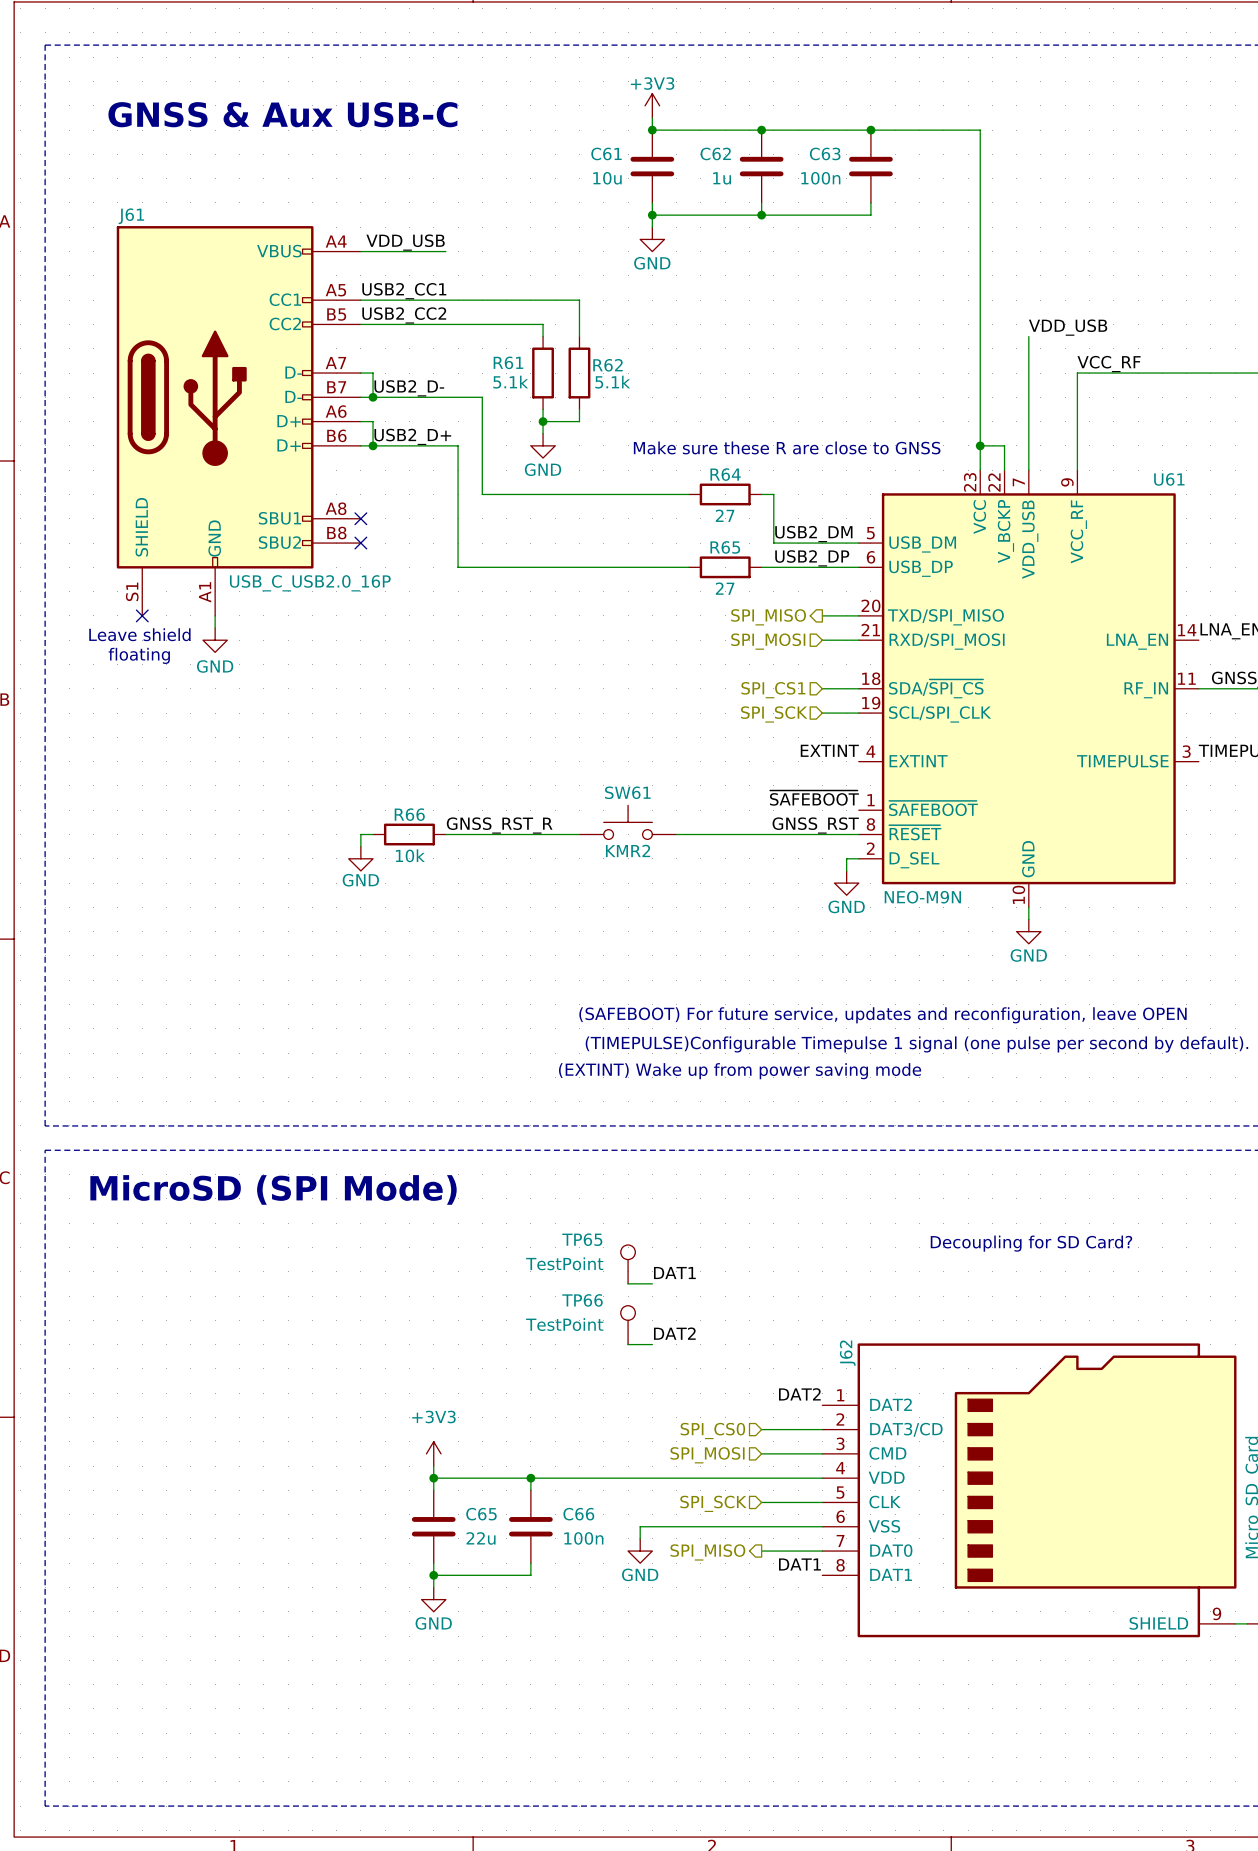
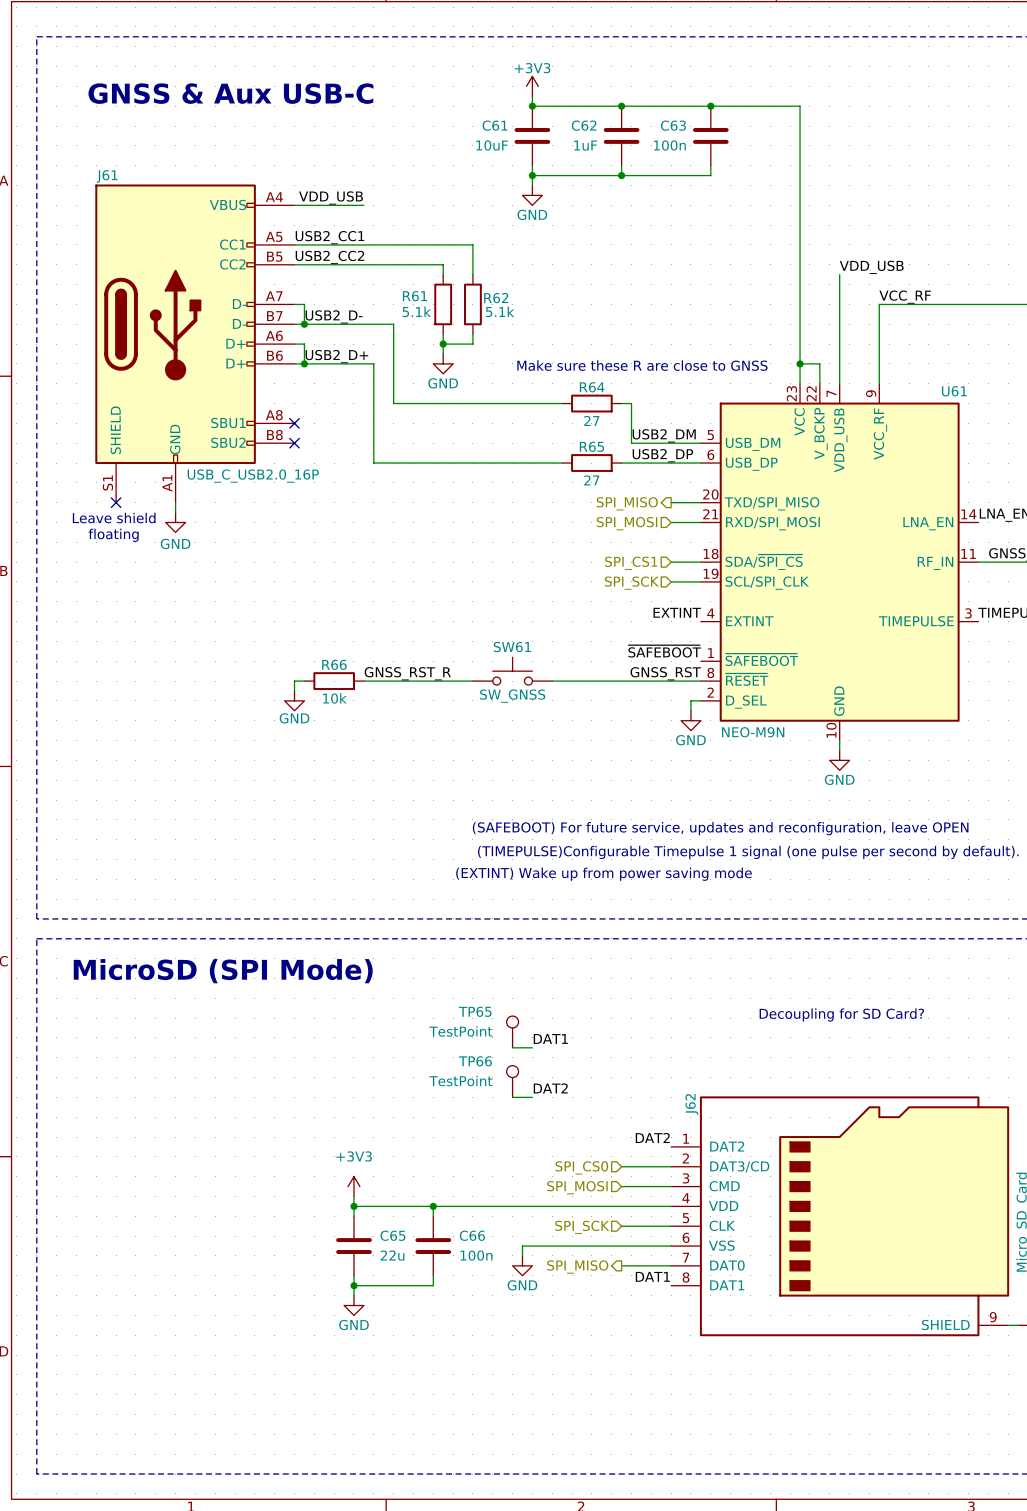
C61 value: 10u (607, 178) -> 10uF (492, 145)
C62 value: 1u (722, 178) -> 1uF (585, 145)
SW61 value: KMR2 (628, 850) -> SW_GNSS (512, 696)

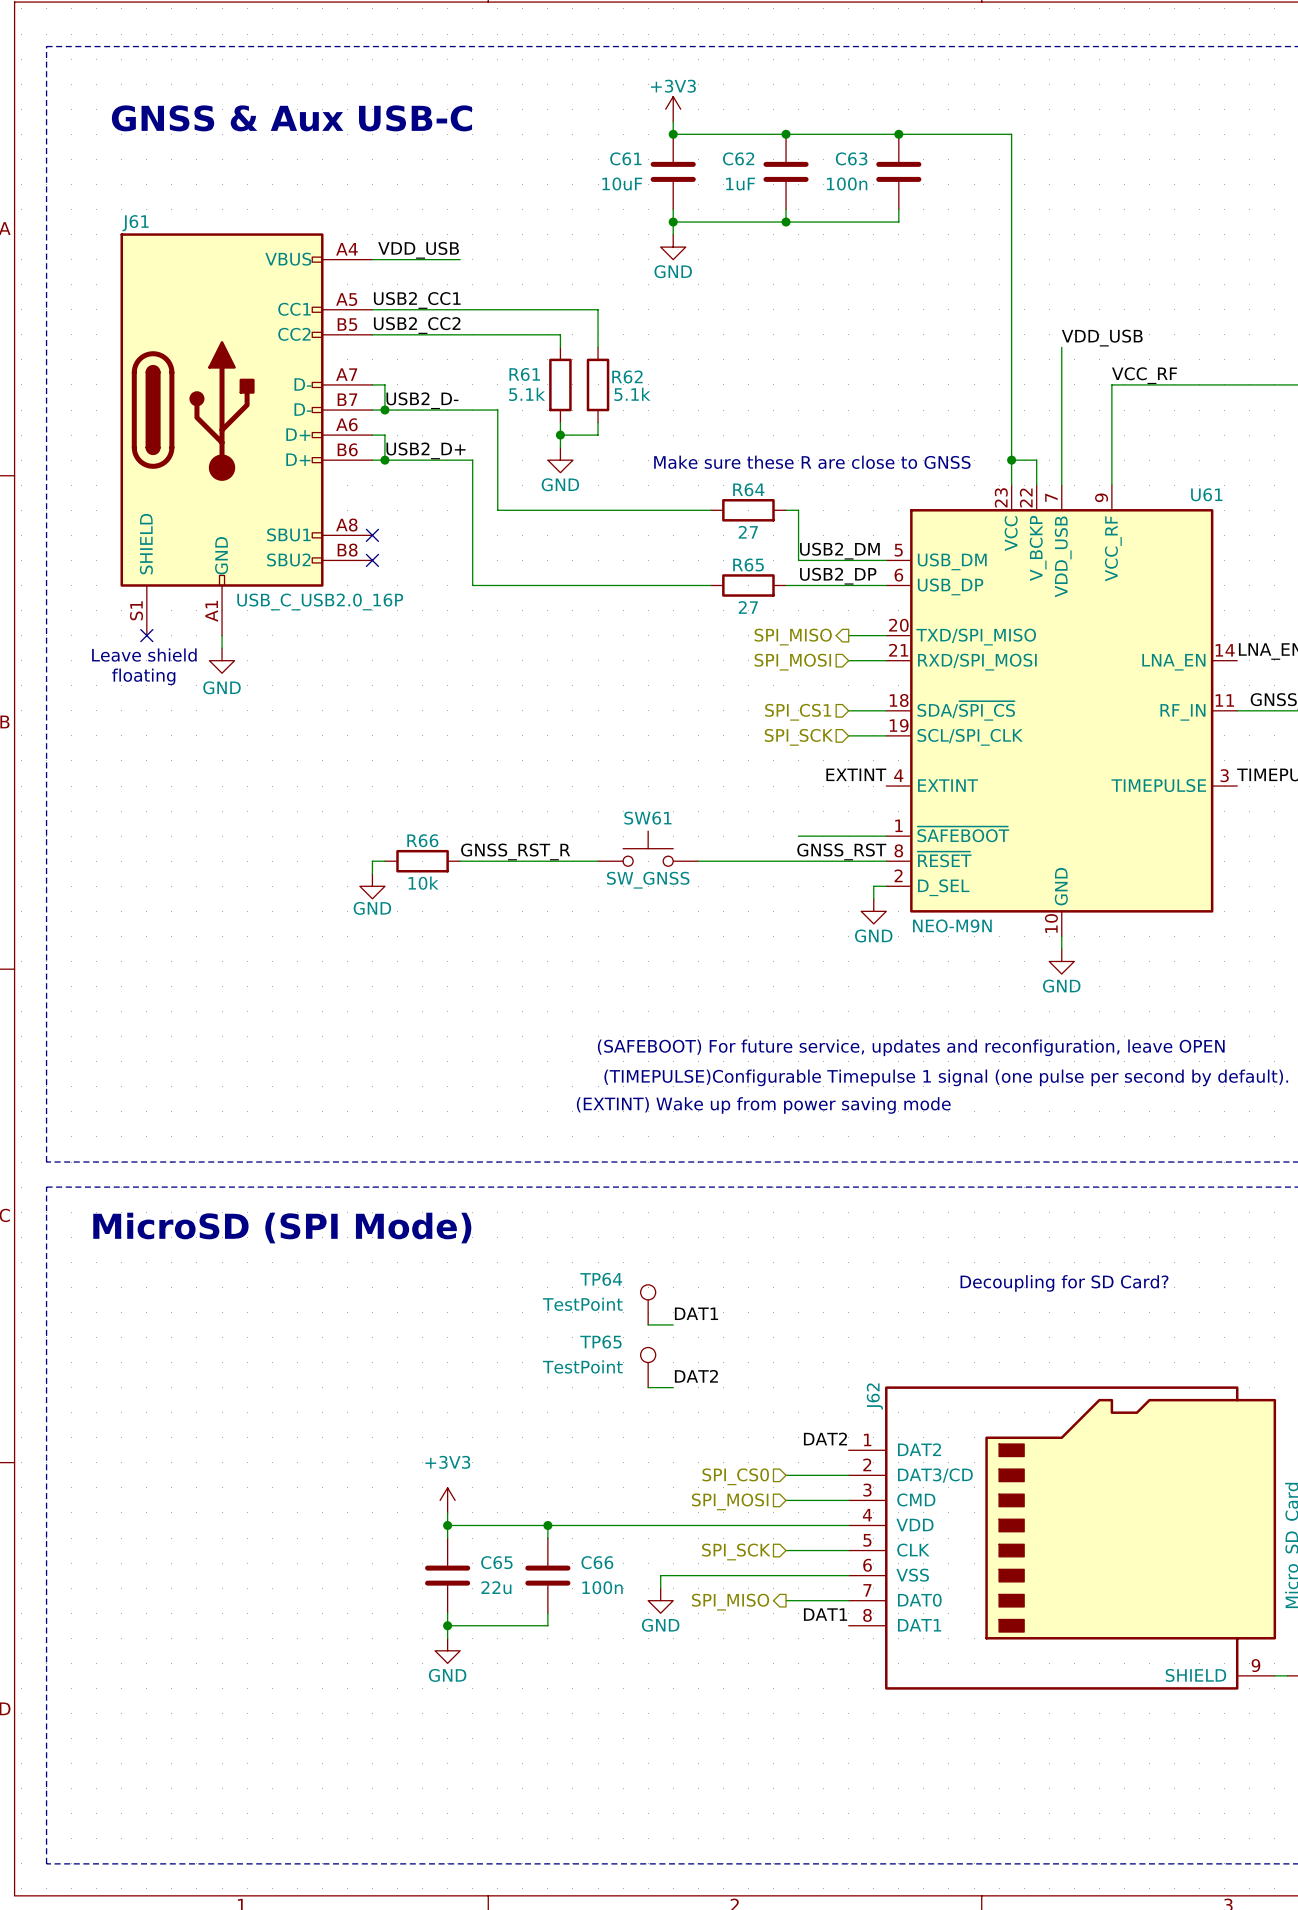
label: ~{SAFEBOOT} (664, 651) -> none
wire: none -> (798, 836) (886, 836)
TP65 name: TP65 (475, 1011) -> TP64 (601, 1279)
TP66 name: TP66 (475, 1061) -> TP65 (600, 1342)

